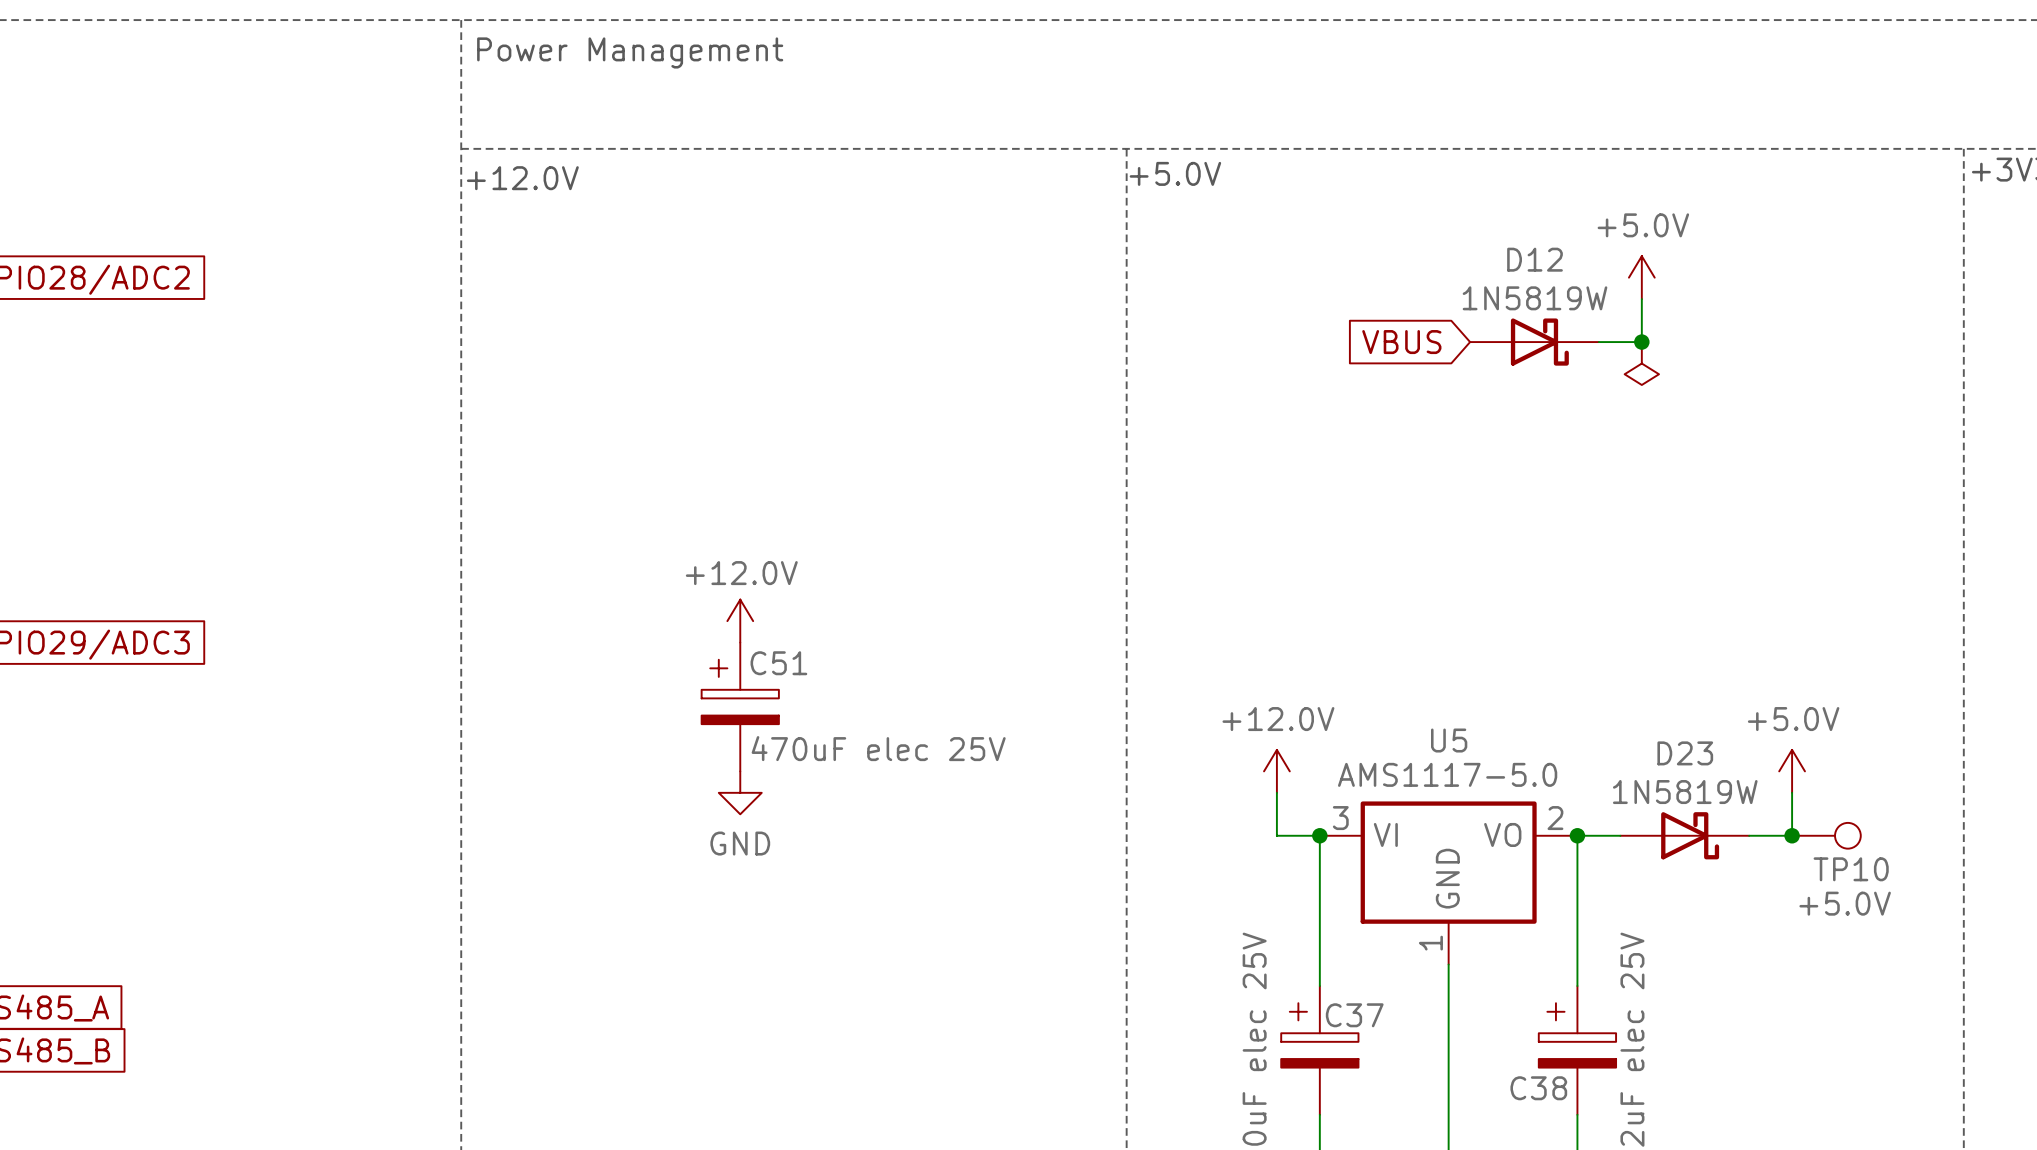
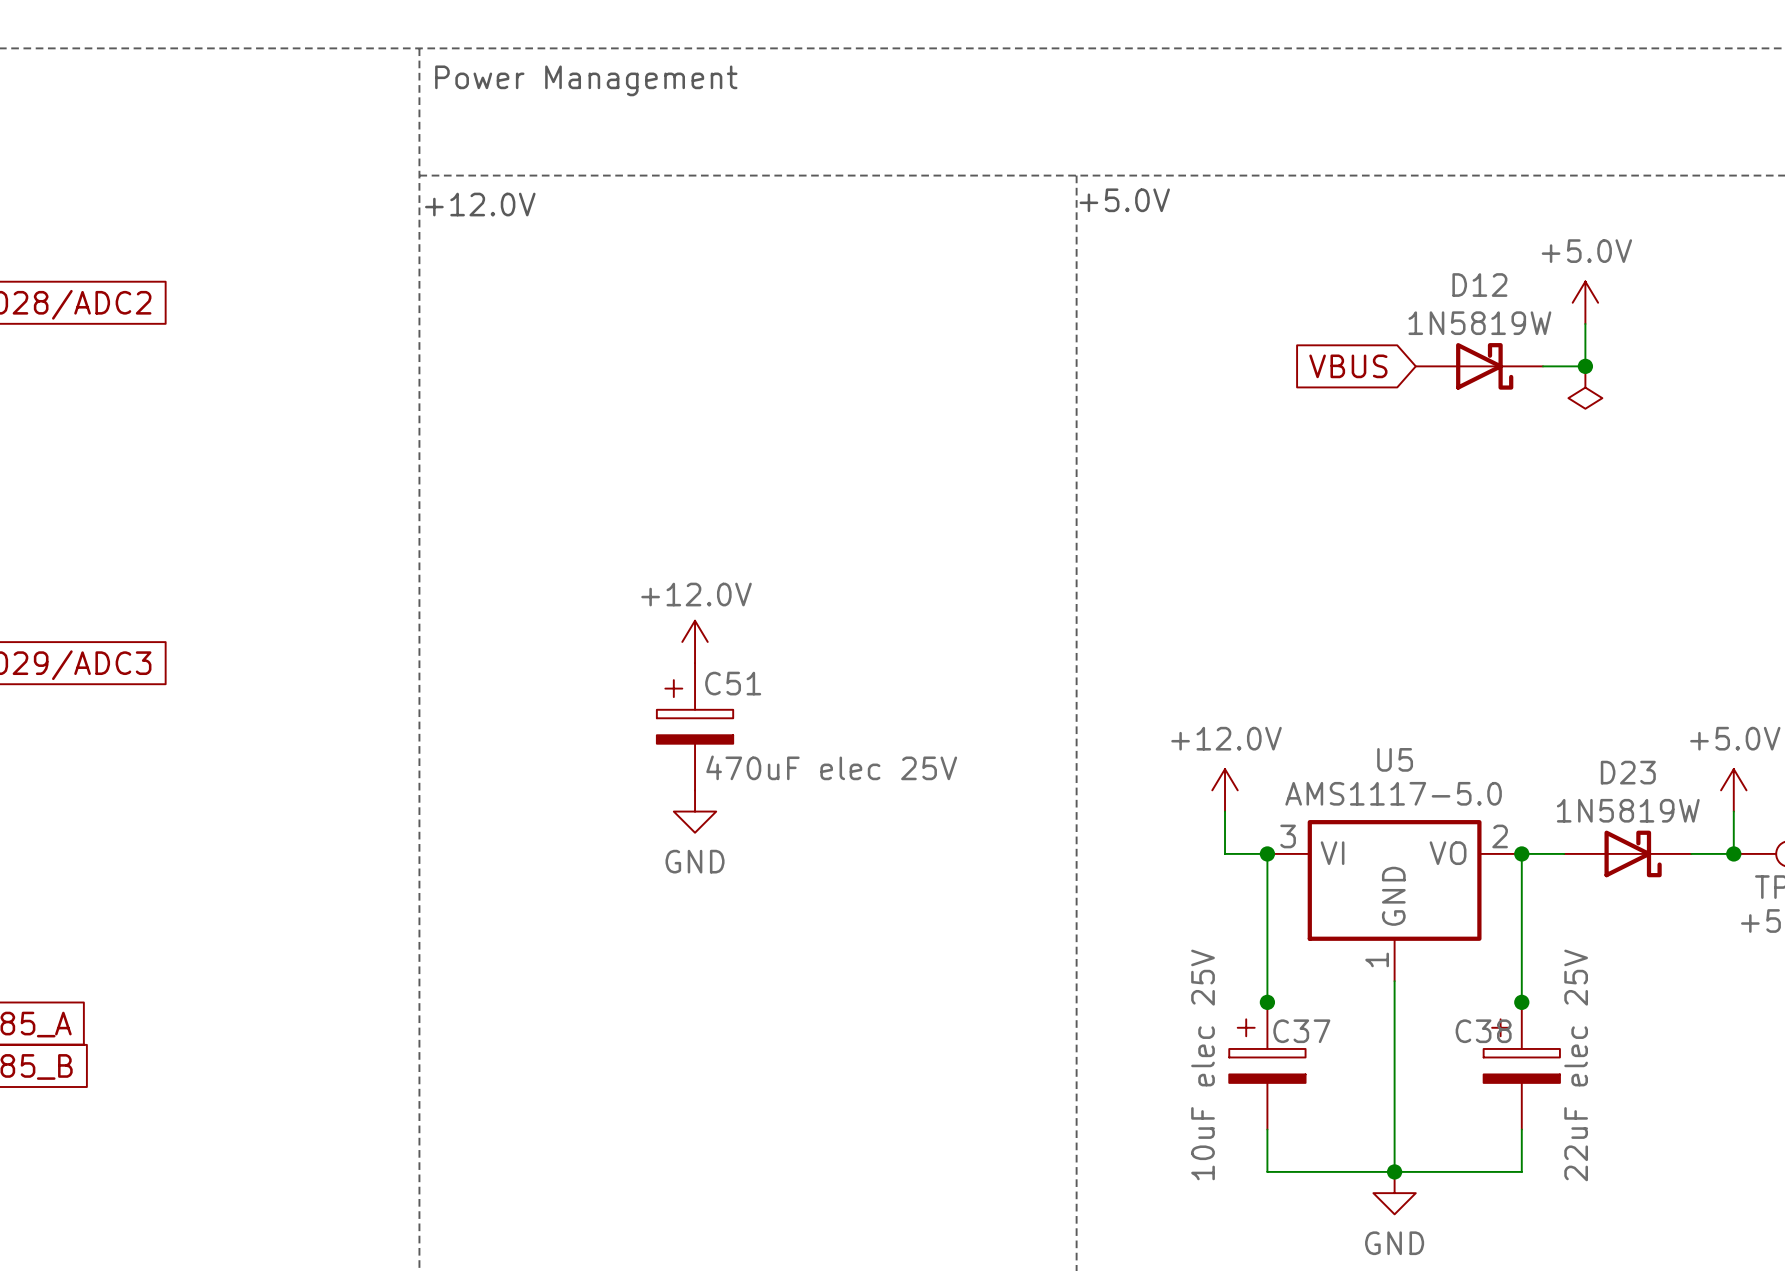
junction: none -> (1267, 1002)
junction: none -> (1521, 1002)
C38 name position: C38 (1538, 1088) -> C38 (1483, 1031)

